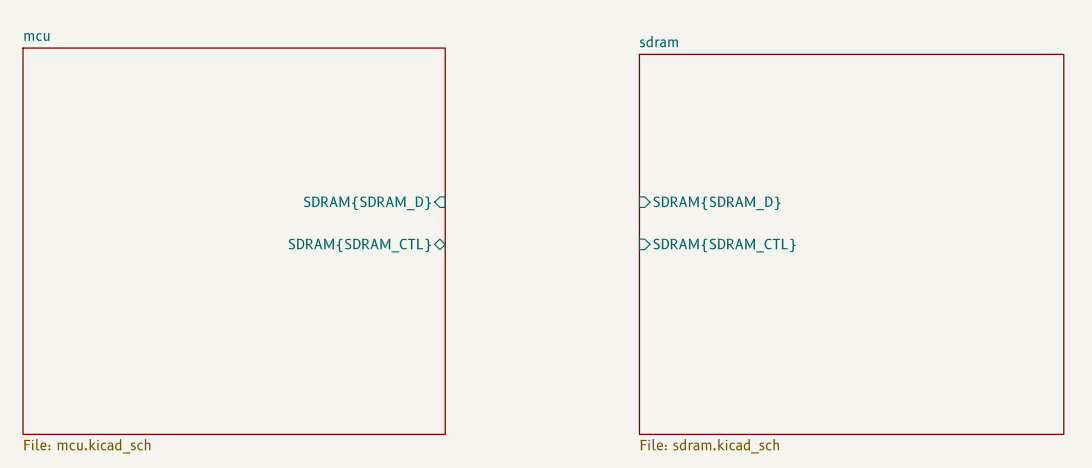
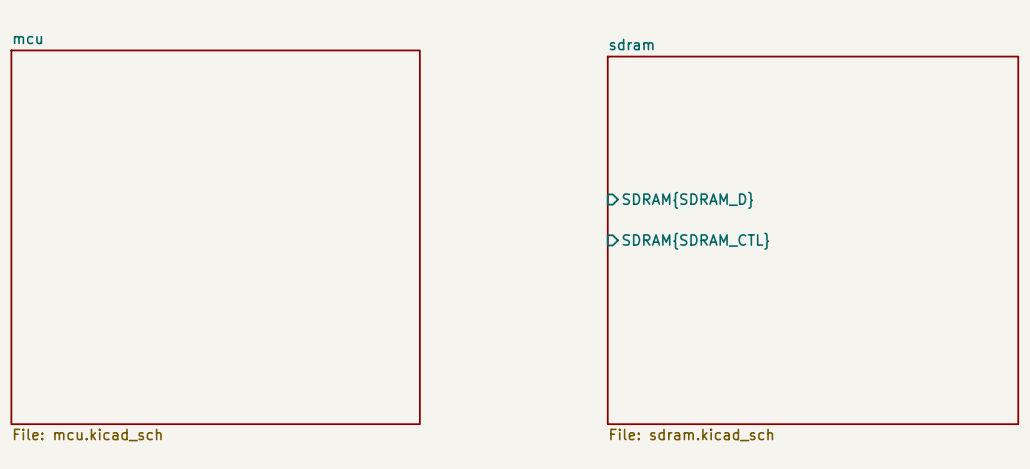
sheet pin: SDRAM{SDRAM_D} (367, 203) -> none
sheet pin: SDRAM{SDRAM_CTL} (359, 245) -> none

